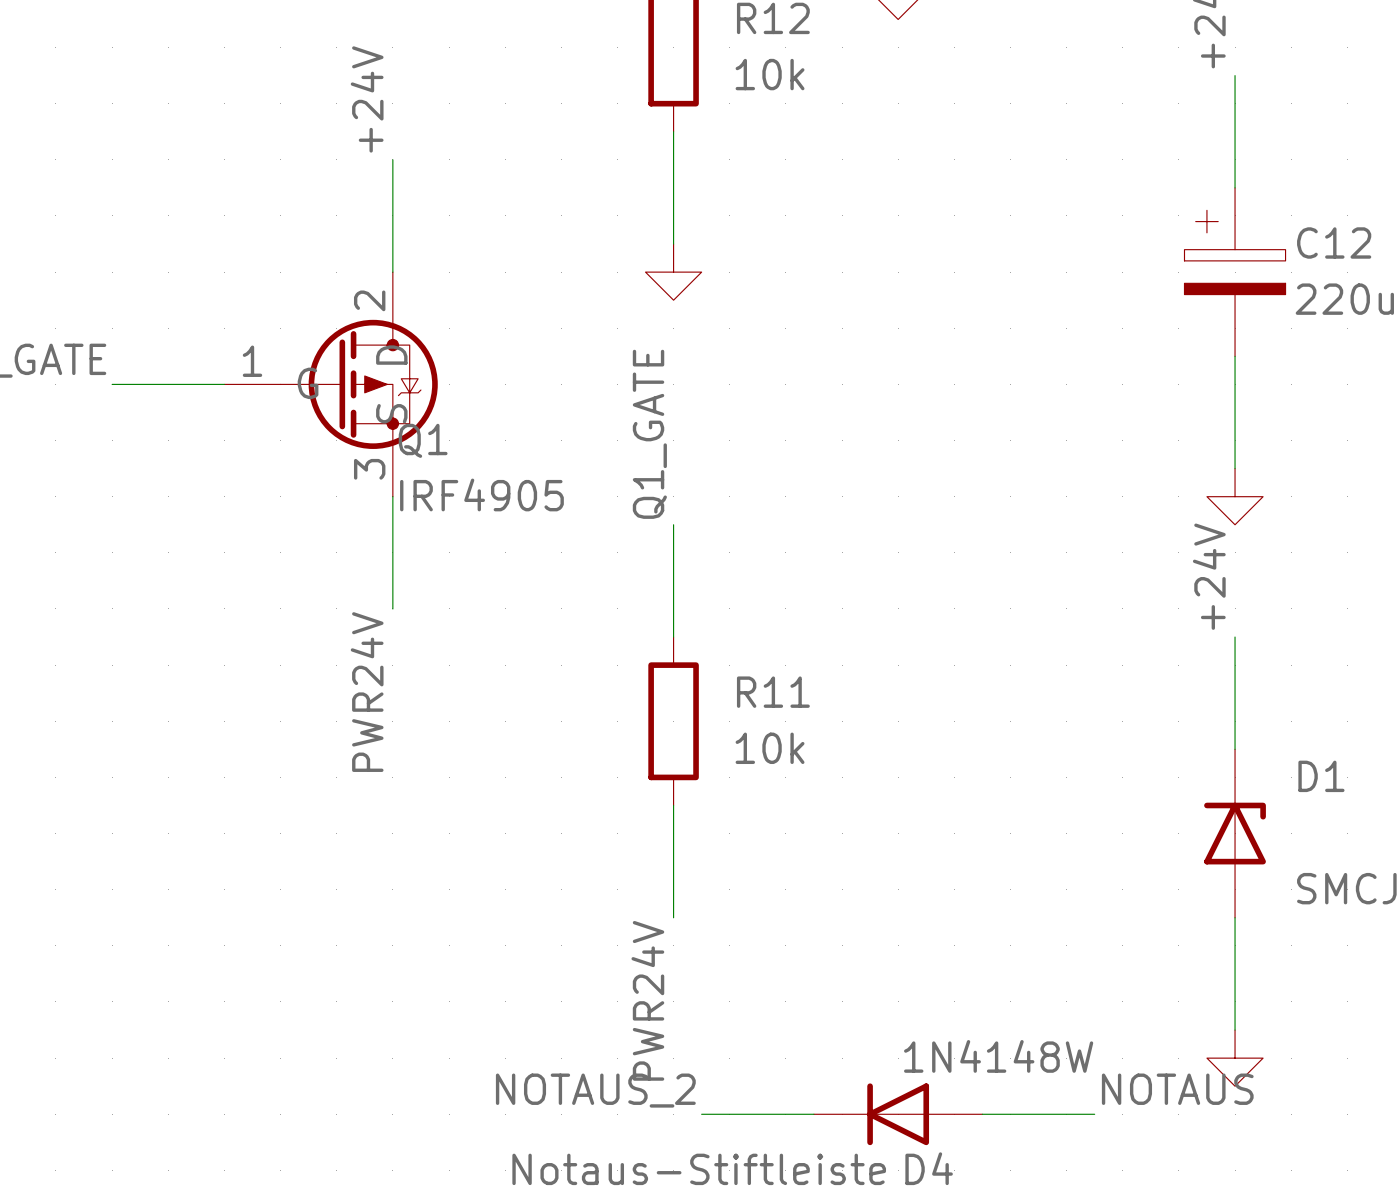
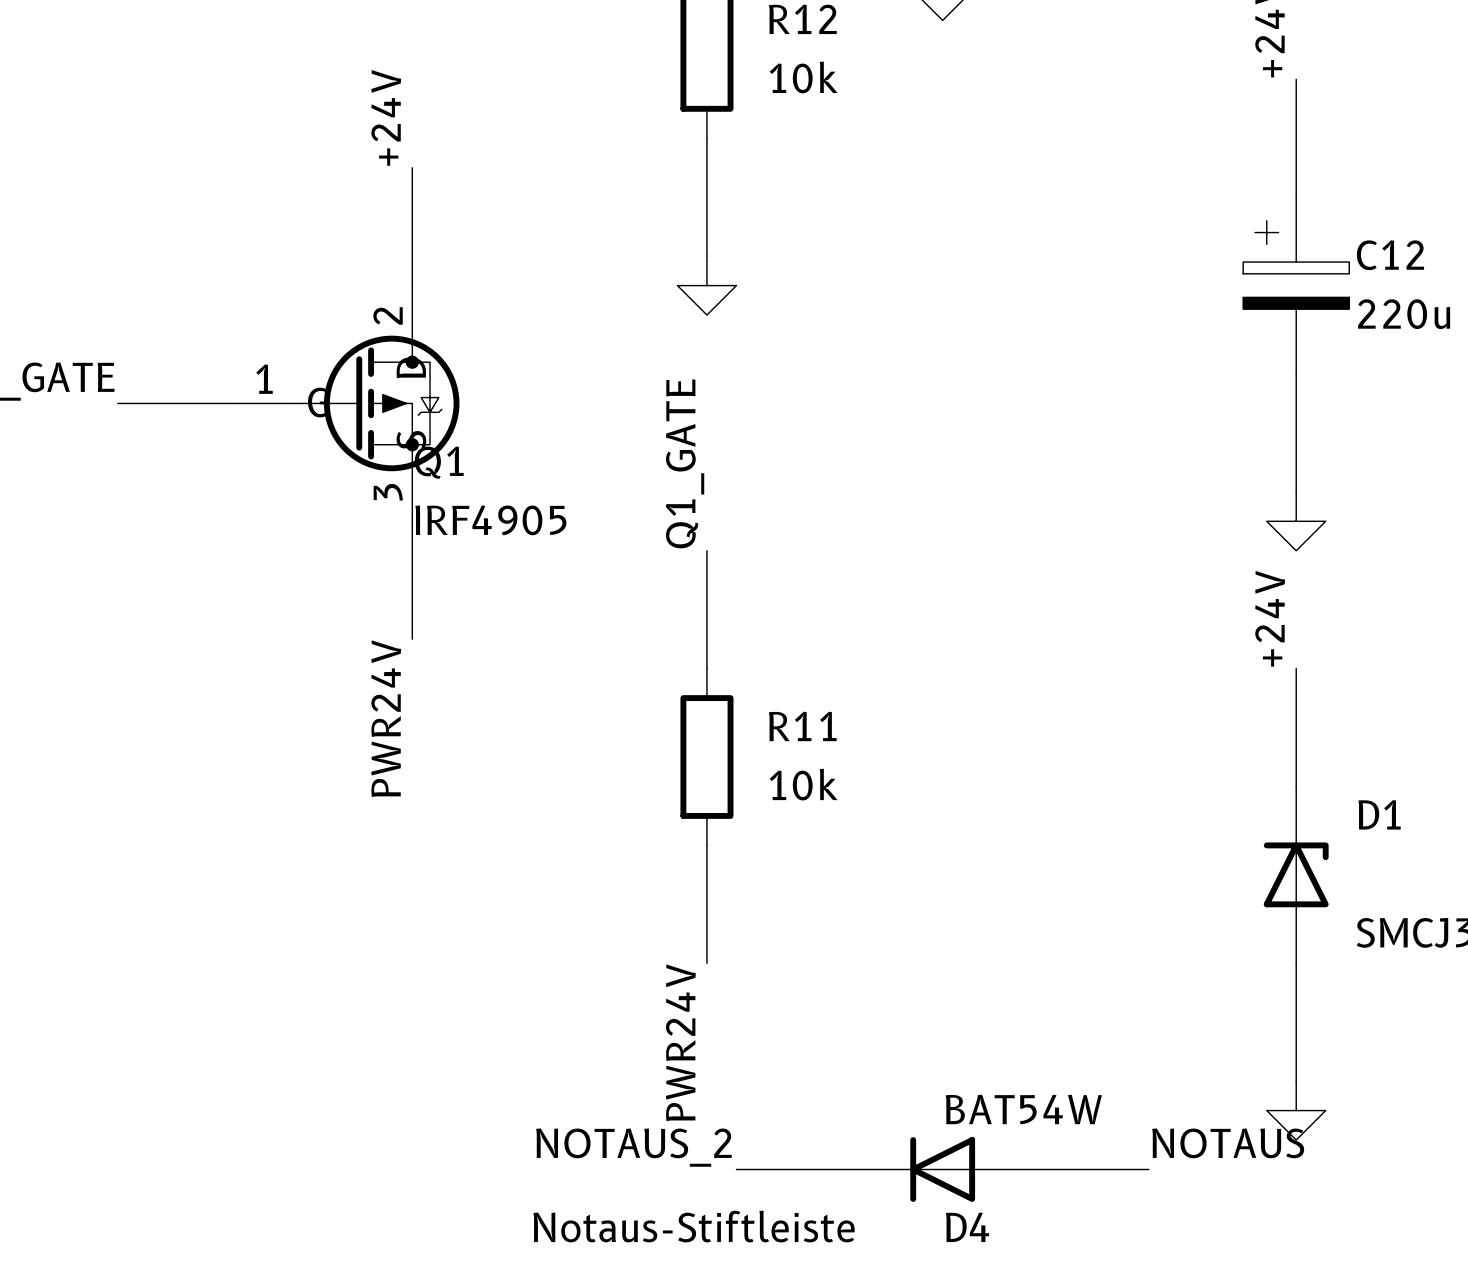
D4 value: 1N4148W (998, 1056) -> BAT54W (1023, 1109)

